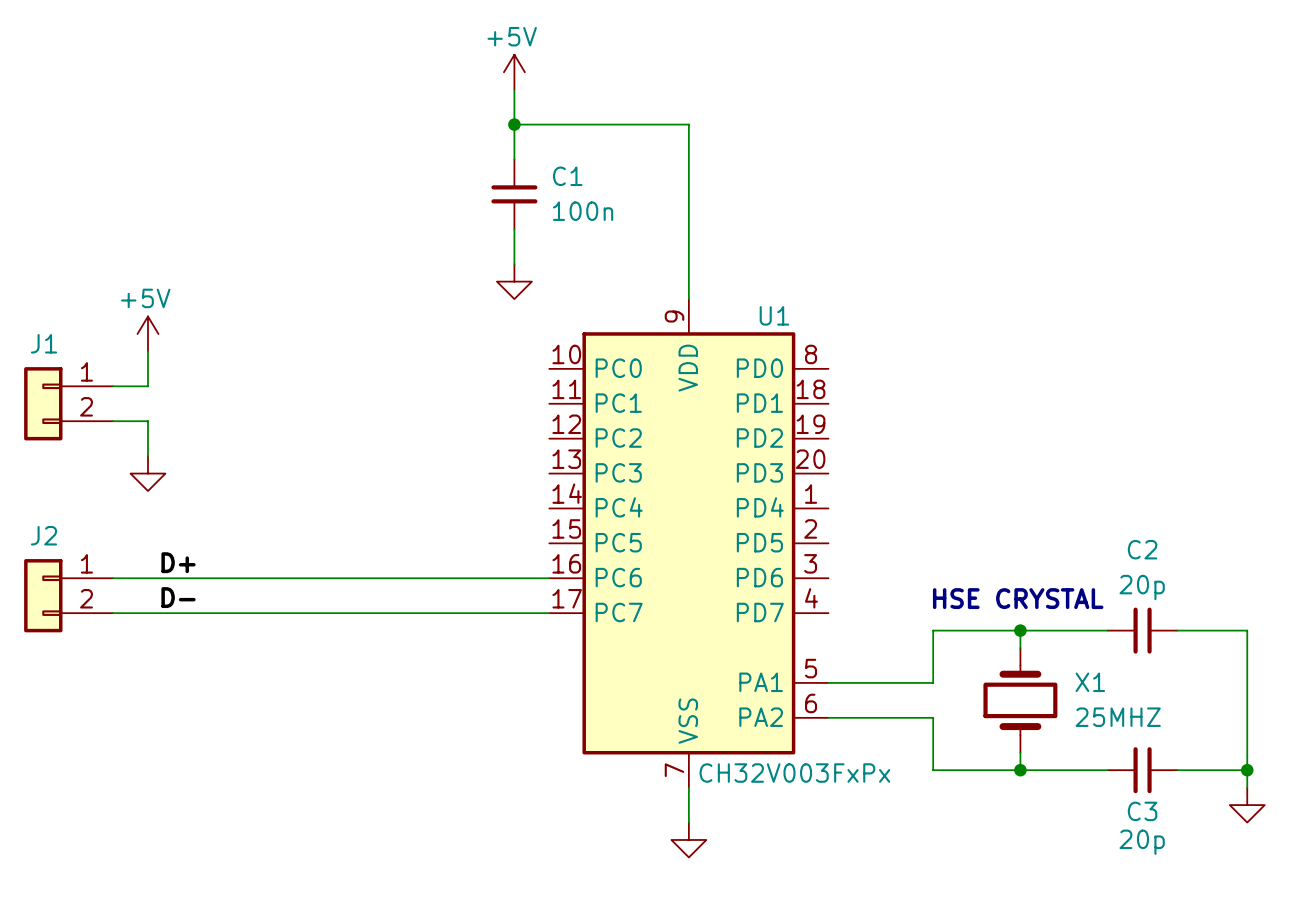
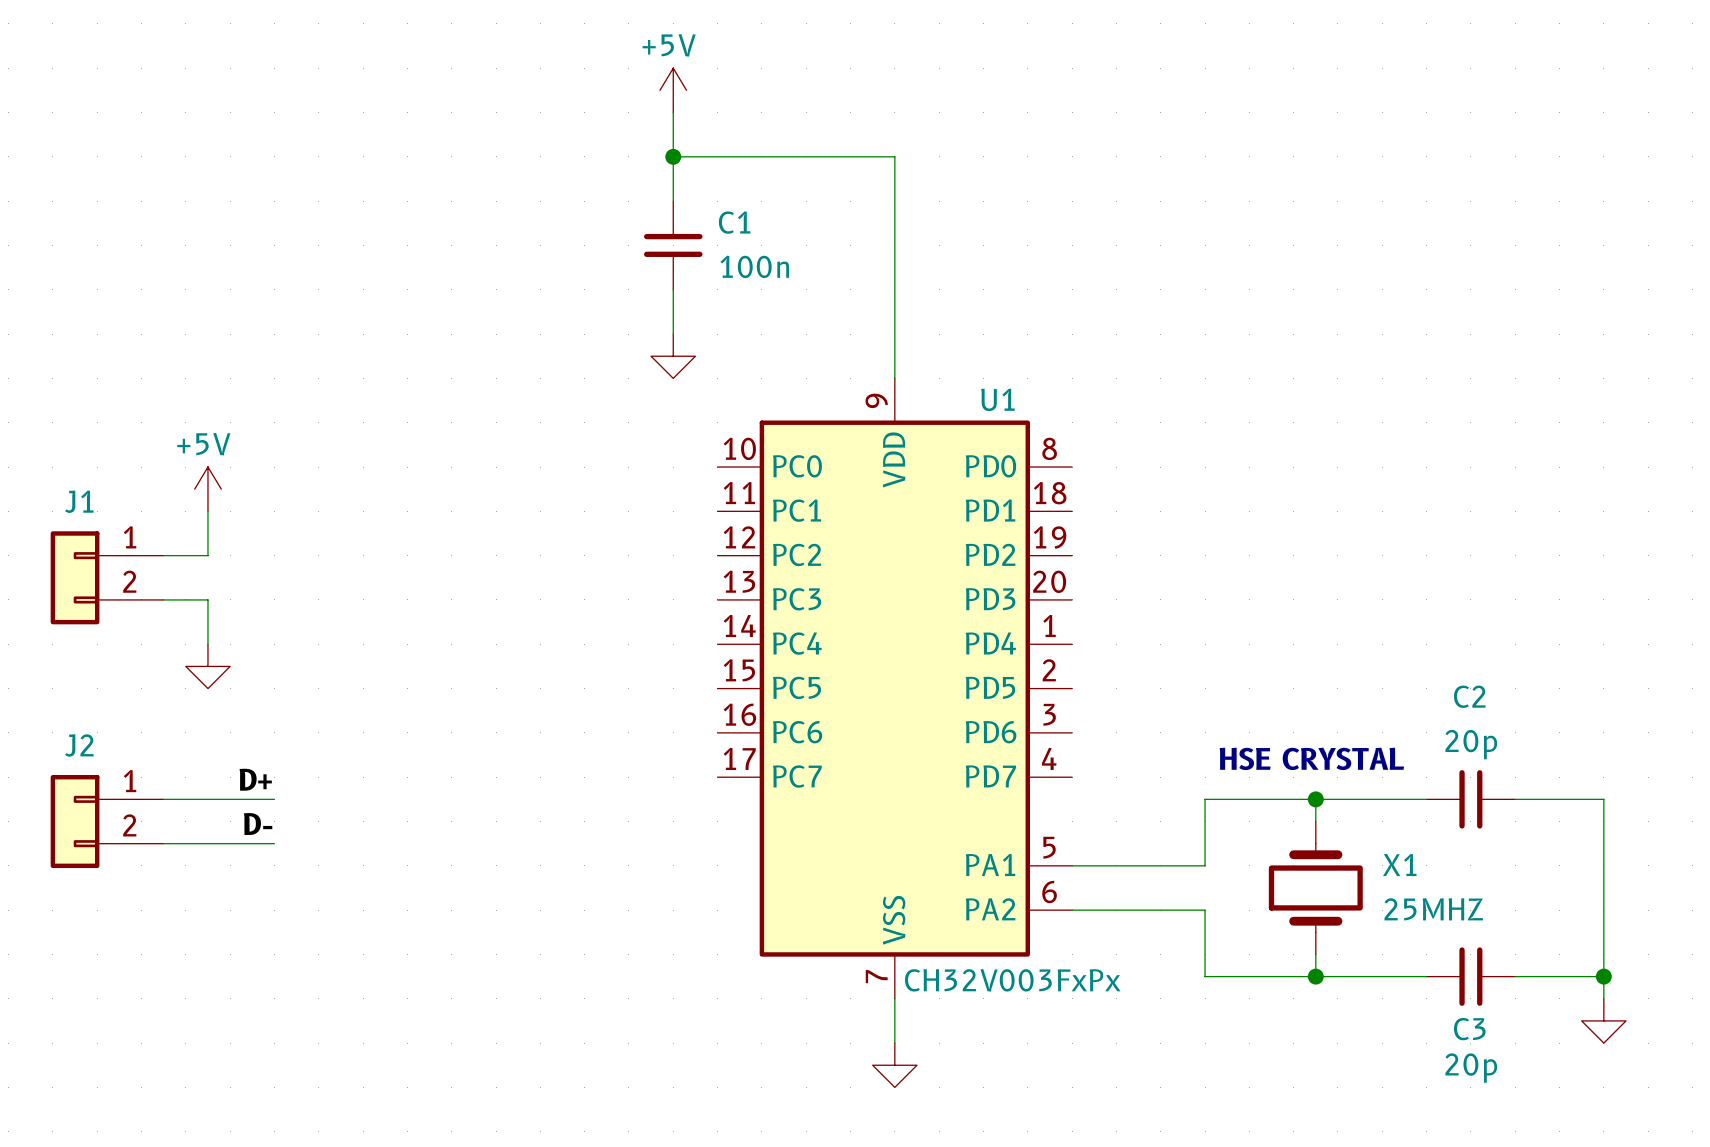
power symbol position: +5V (147, 333) -> +5V (207, 489)
wire: (147, 351) (147, 386) (113, 386) -> none
J1 position: (68, 403) -> (107, 577)
wire: (113, 421) (147, 421) -> (207, 511) (207, 533)
wire: (147, 438) (147, 456) -> (207, 555) (163, 555)
wire: none -> (163, 599) (207, 599) (207, 644)
power symbol position: (147, 473) -> (207, 666)
label position: D+ (178, 562) -> D+ (255, 779)
wire: (113, 578) (549, 578) -> none
J2 position: (68, 595) -> (107, 821)
label position: D- (178, 597) -> D- (258, 824)
wire: (113, 613) (549, 613) -> none
wire: none -> (163, 799) (274, 799)
wire: none -> (163, 843) (274, 843)

